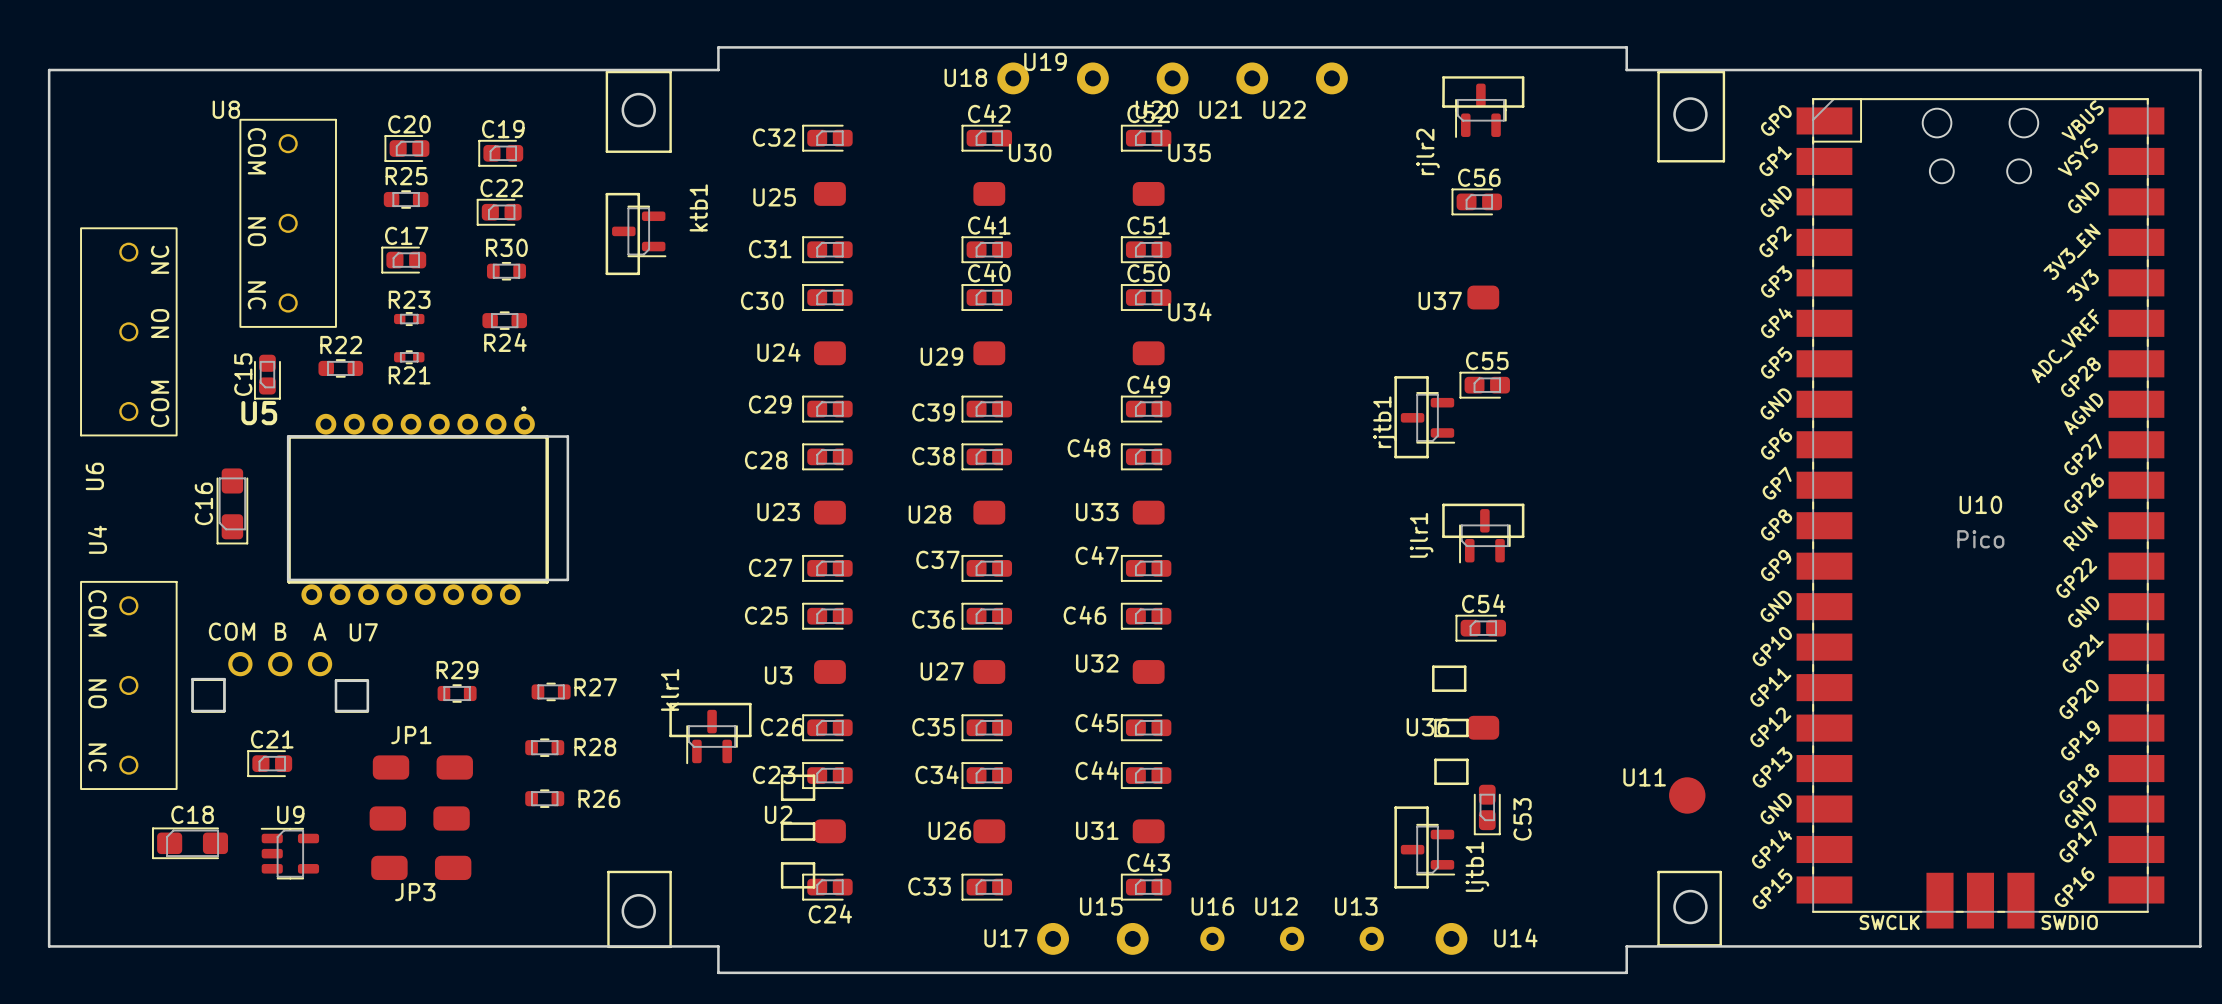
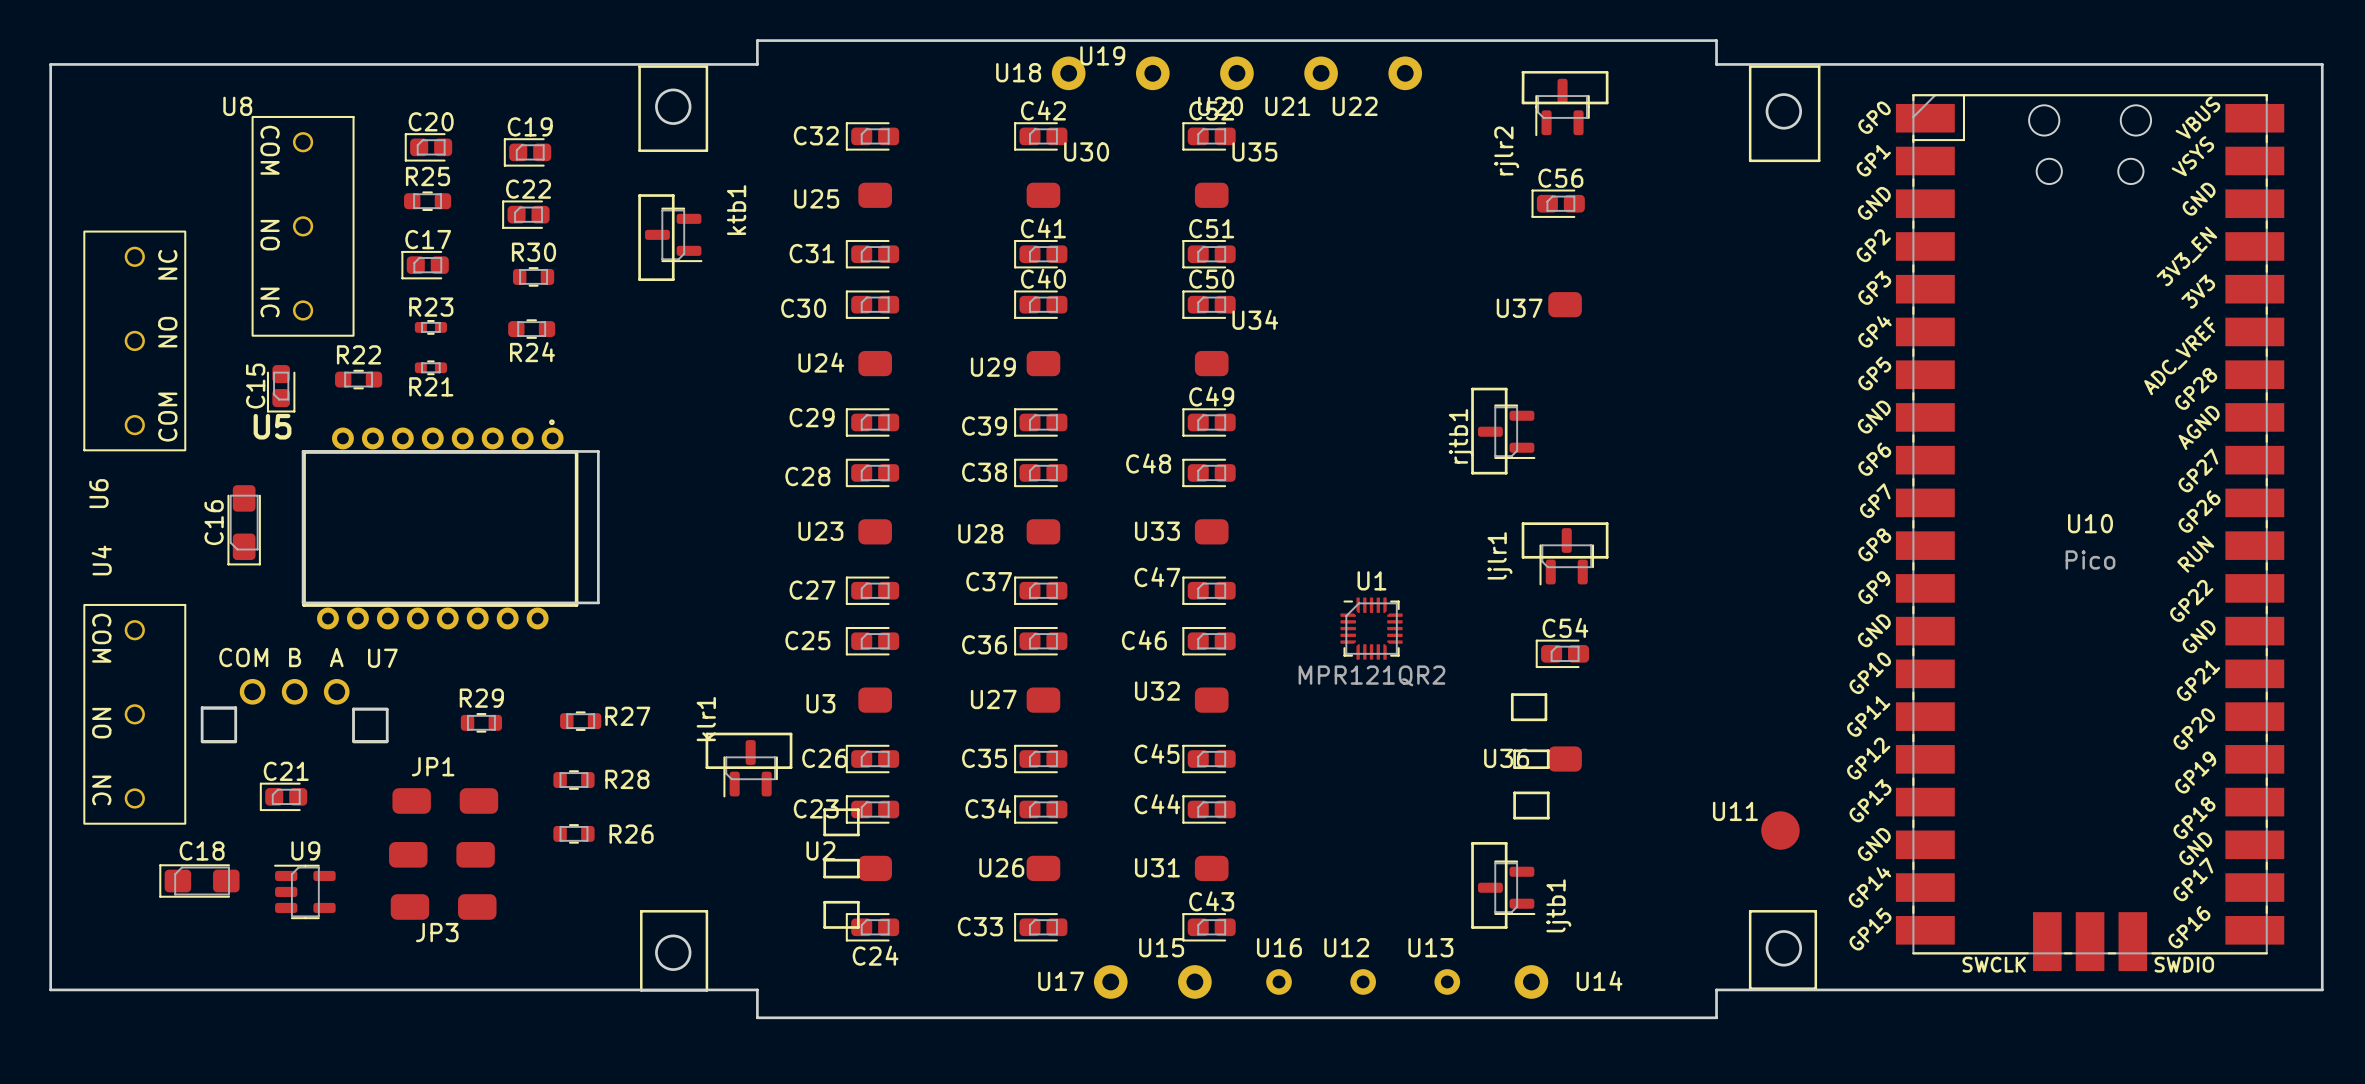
C55: (1484, 385) -> none
U1: none -> MPR121QR2 (1371, 628)
C53: (1487, 809) -> none

